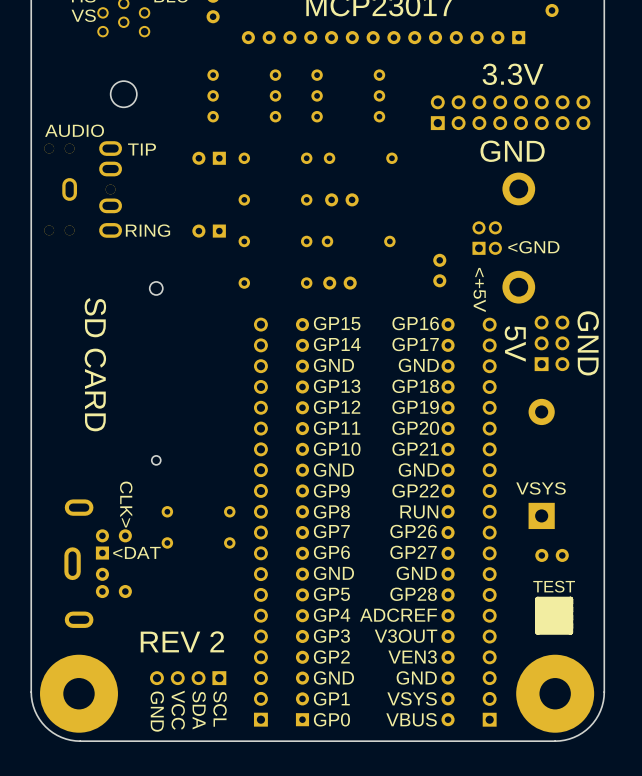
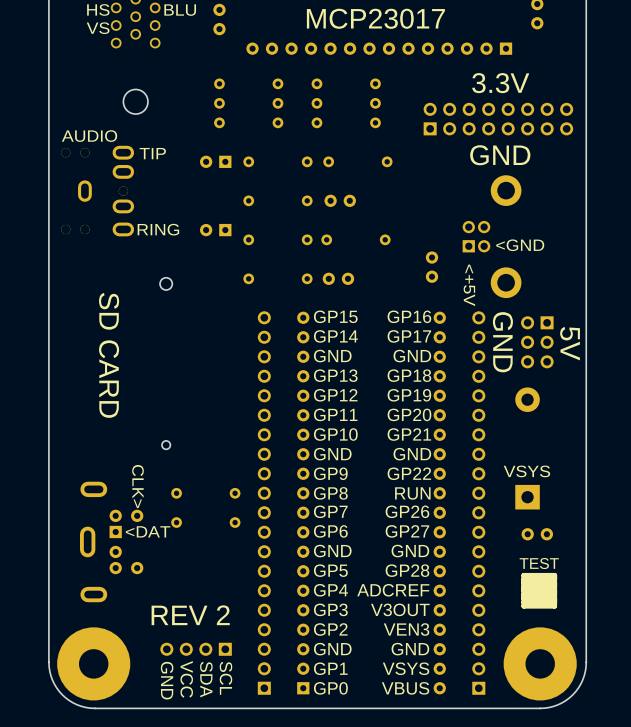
text: 5V (515, 343) -> GND (502, 342)
part rotation: 0° (552, 343) -> 180° (537, 342)
text: GND (588, 343) -> none
text: none -> 5V (570, 343)

